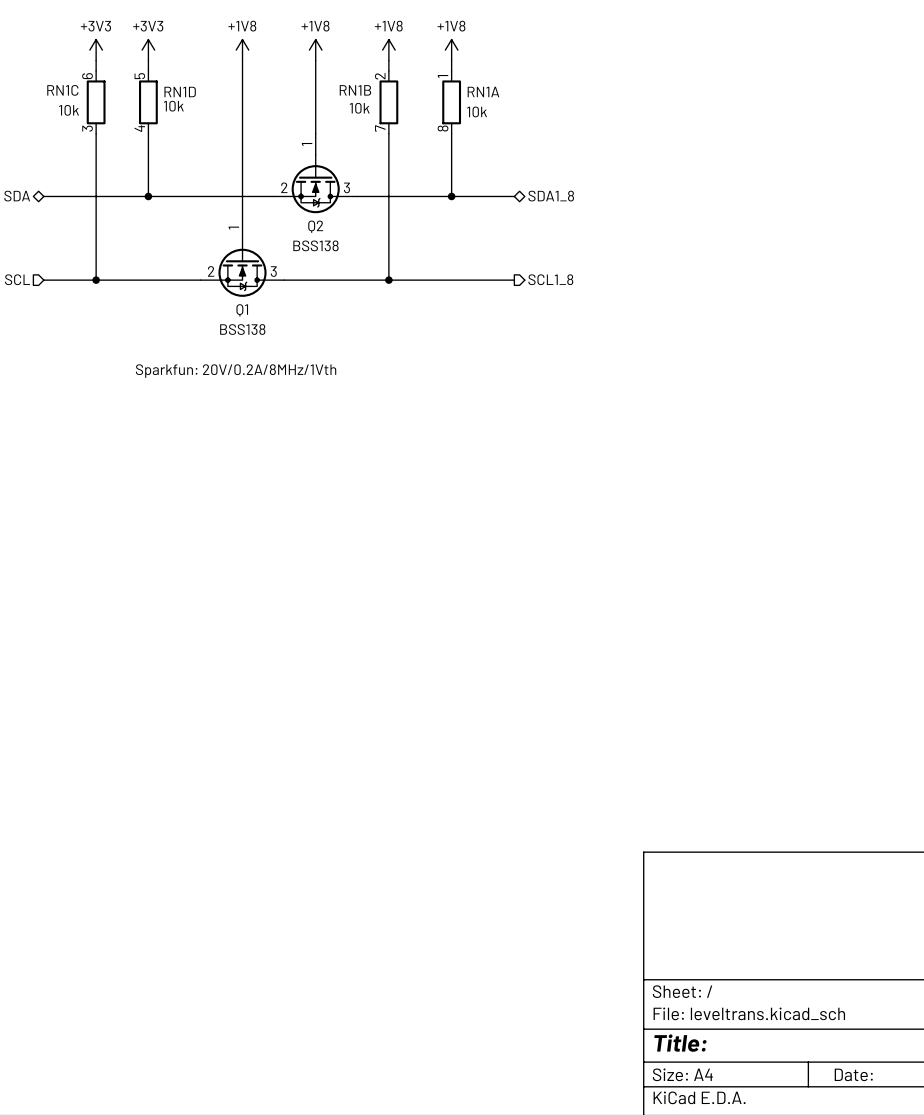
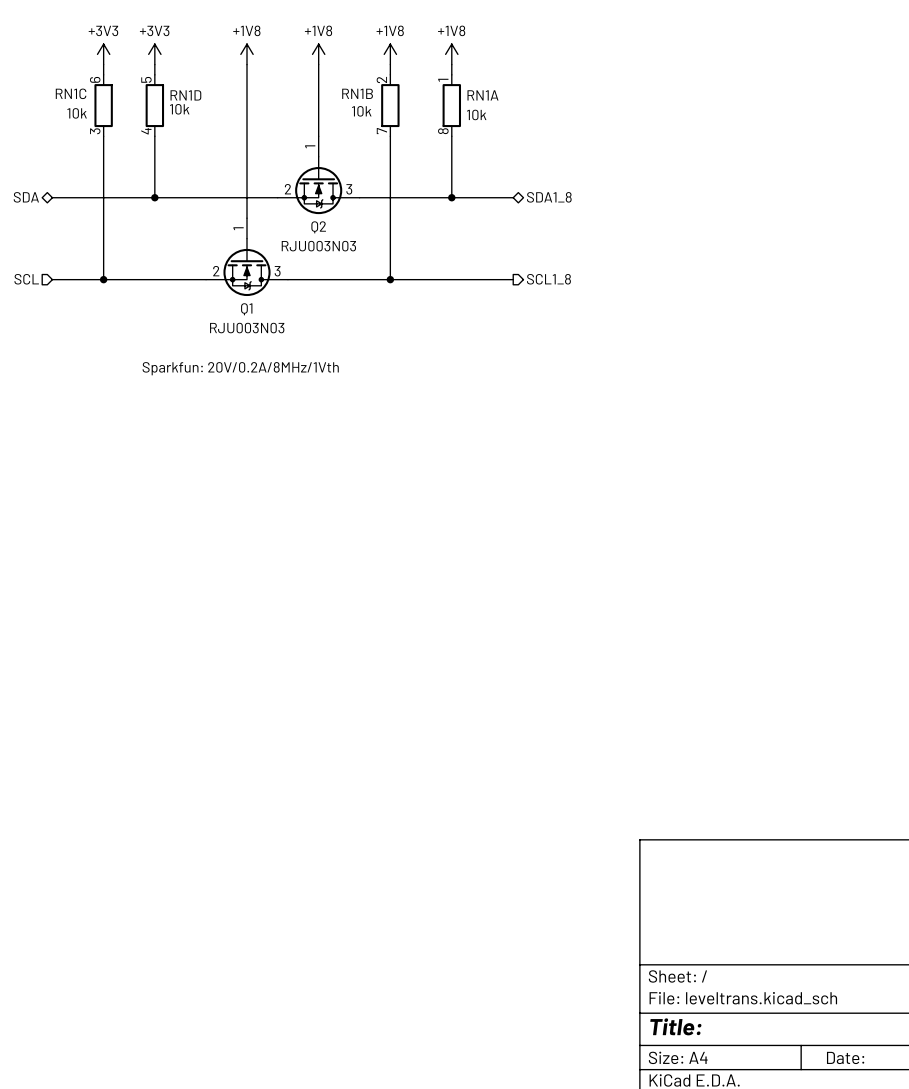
Q2 value: BSS138 (315, 245) -> RJU003N03 (318, 246)
Q1 value: BSS138 (242, 329) -> RJU003N03 (247, 328)

